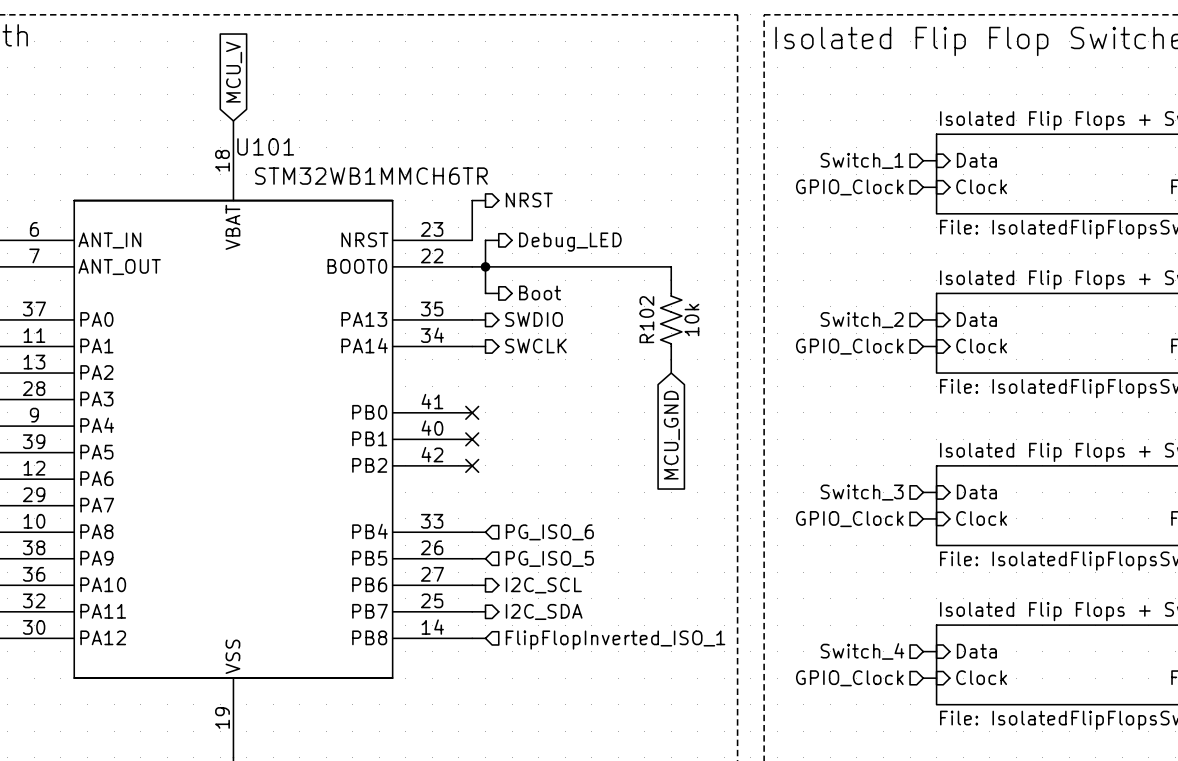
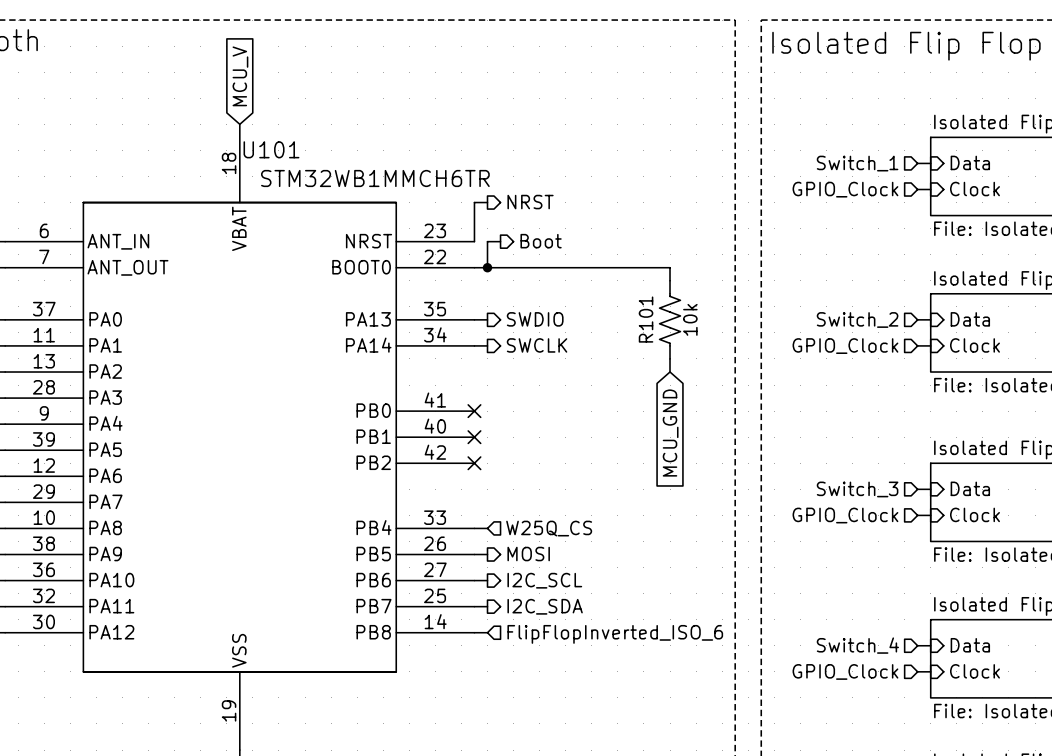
hierarchical label: Debug_LED (570, 242) -> Boot (541, 241)
wire: (485, 266) (485, 293) (498, 293) -> none
hierarchical label: Boot (540, 292) -> none
R102 name: R102 (646, 319) -> R101 (646, 319)
hierarchical label: PG_ISO_6 (549, 532) -> W25Q_CS (549, 528)
hierarchical label shape: input (549, 558) -> output (528, 554)
hierarchical label: PG_ISO_5 (549, 558) -> MOSI (528, 554)
hierarchical label: FlipFlopInverted_ISO_1 (615, 640) -> FlipFlopInverted_ISO_6 (615, 634)

